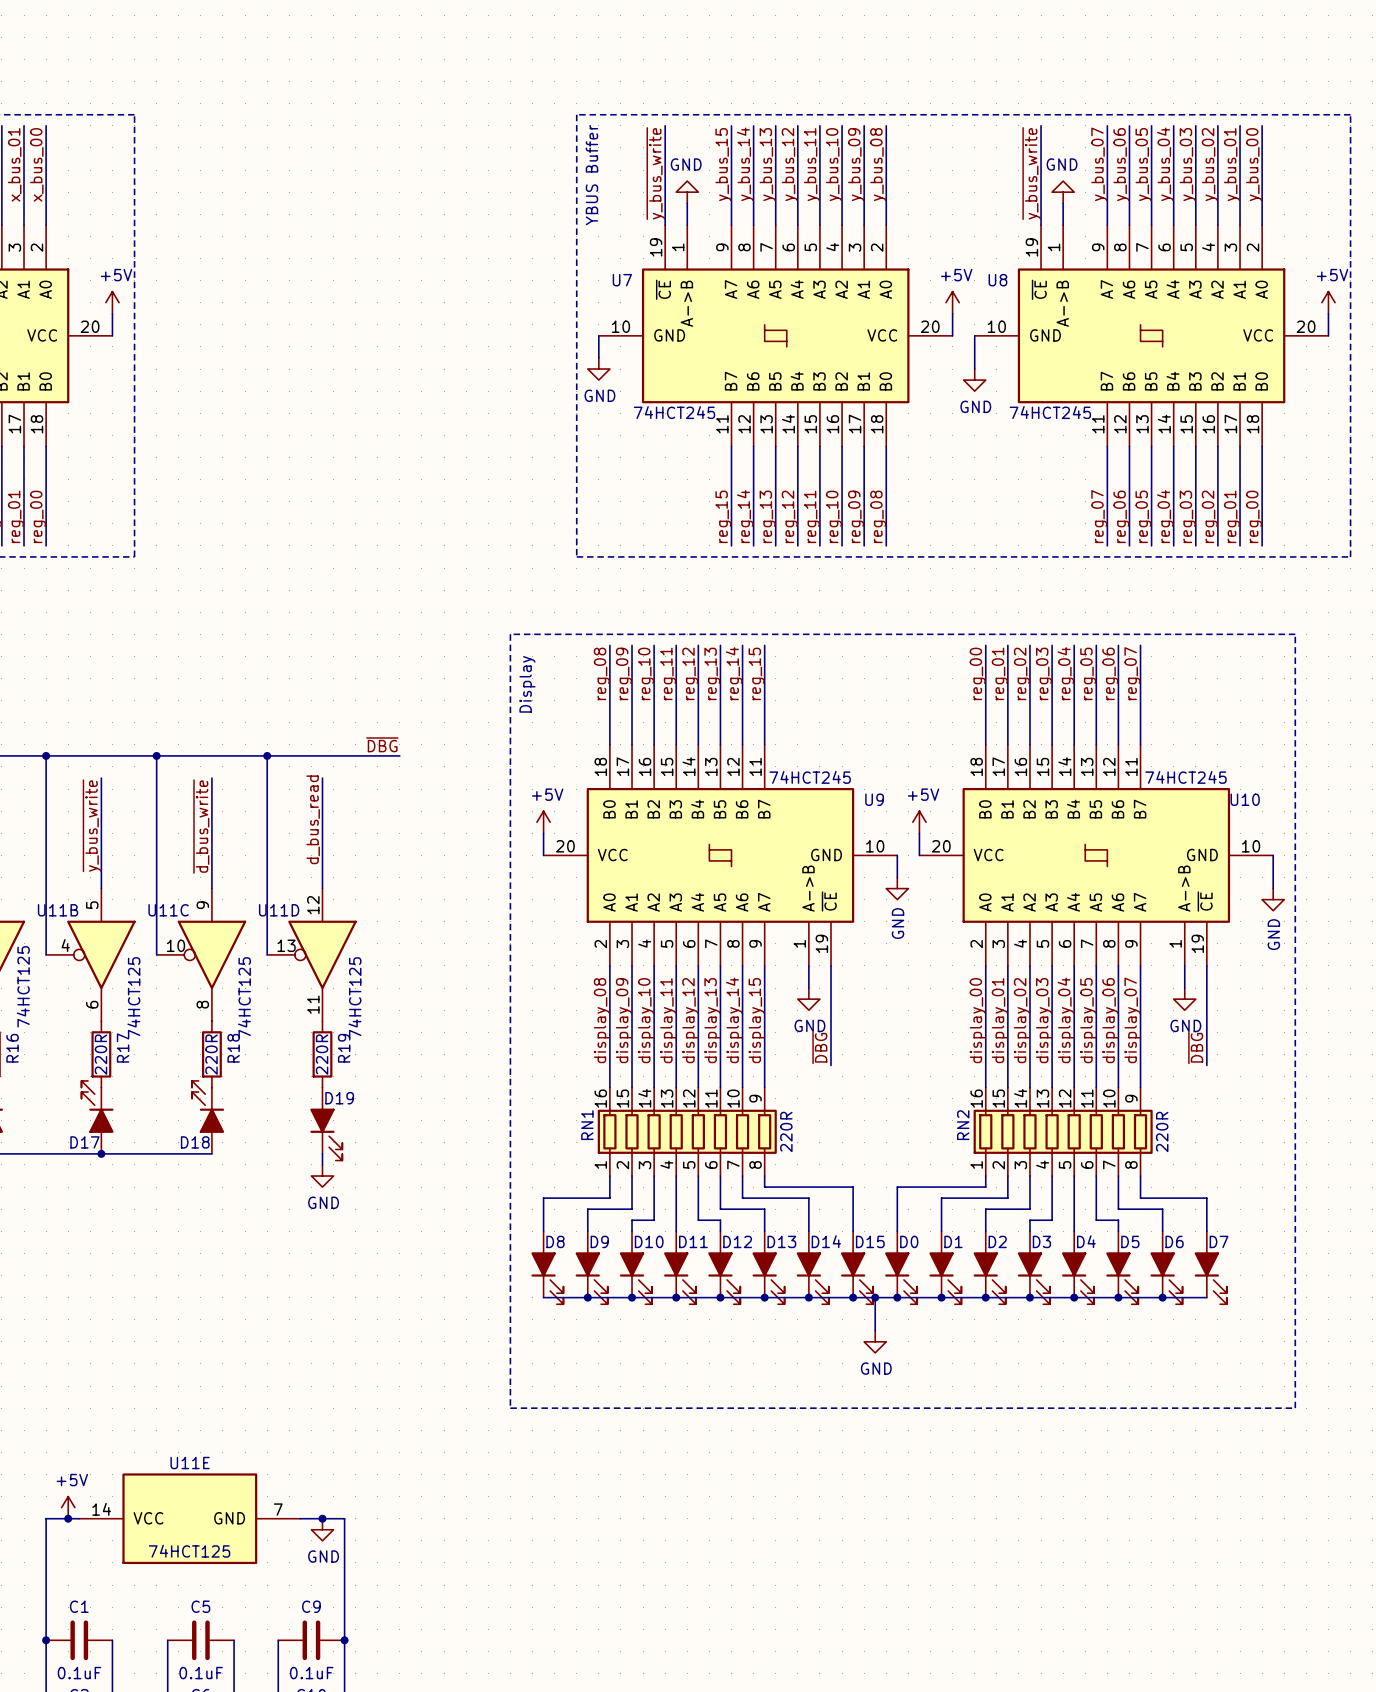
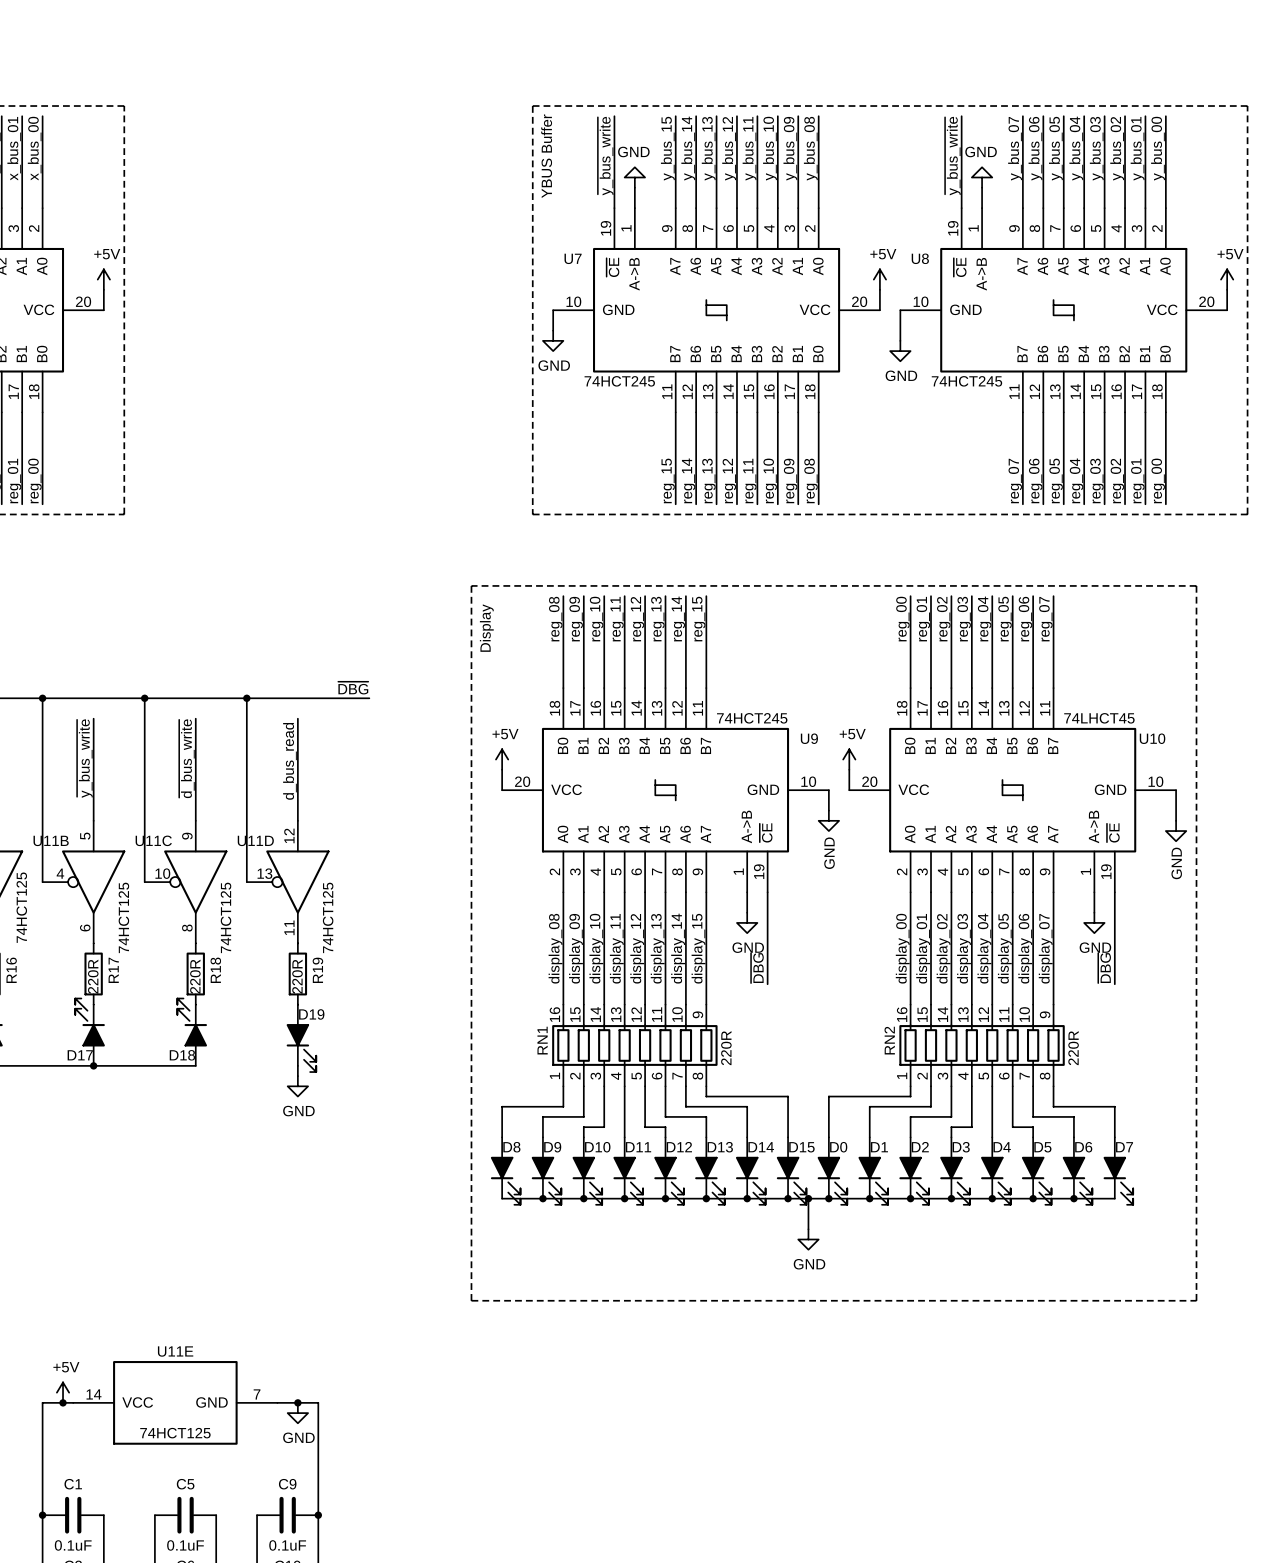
U10 value: 74HCT245 (1185, 777) -> 74LHCT45 (1099, 718)

